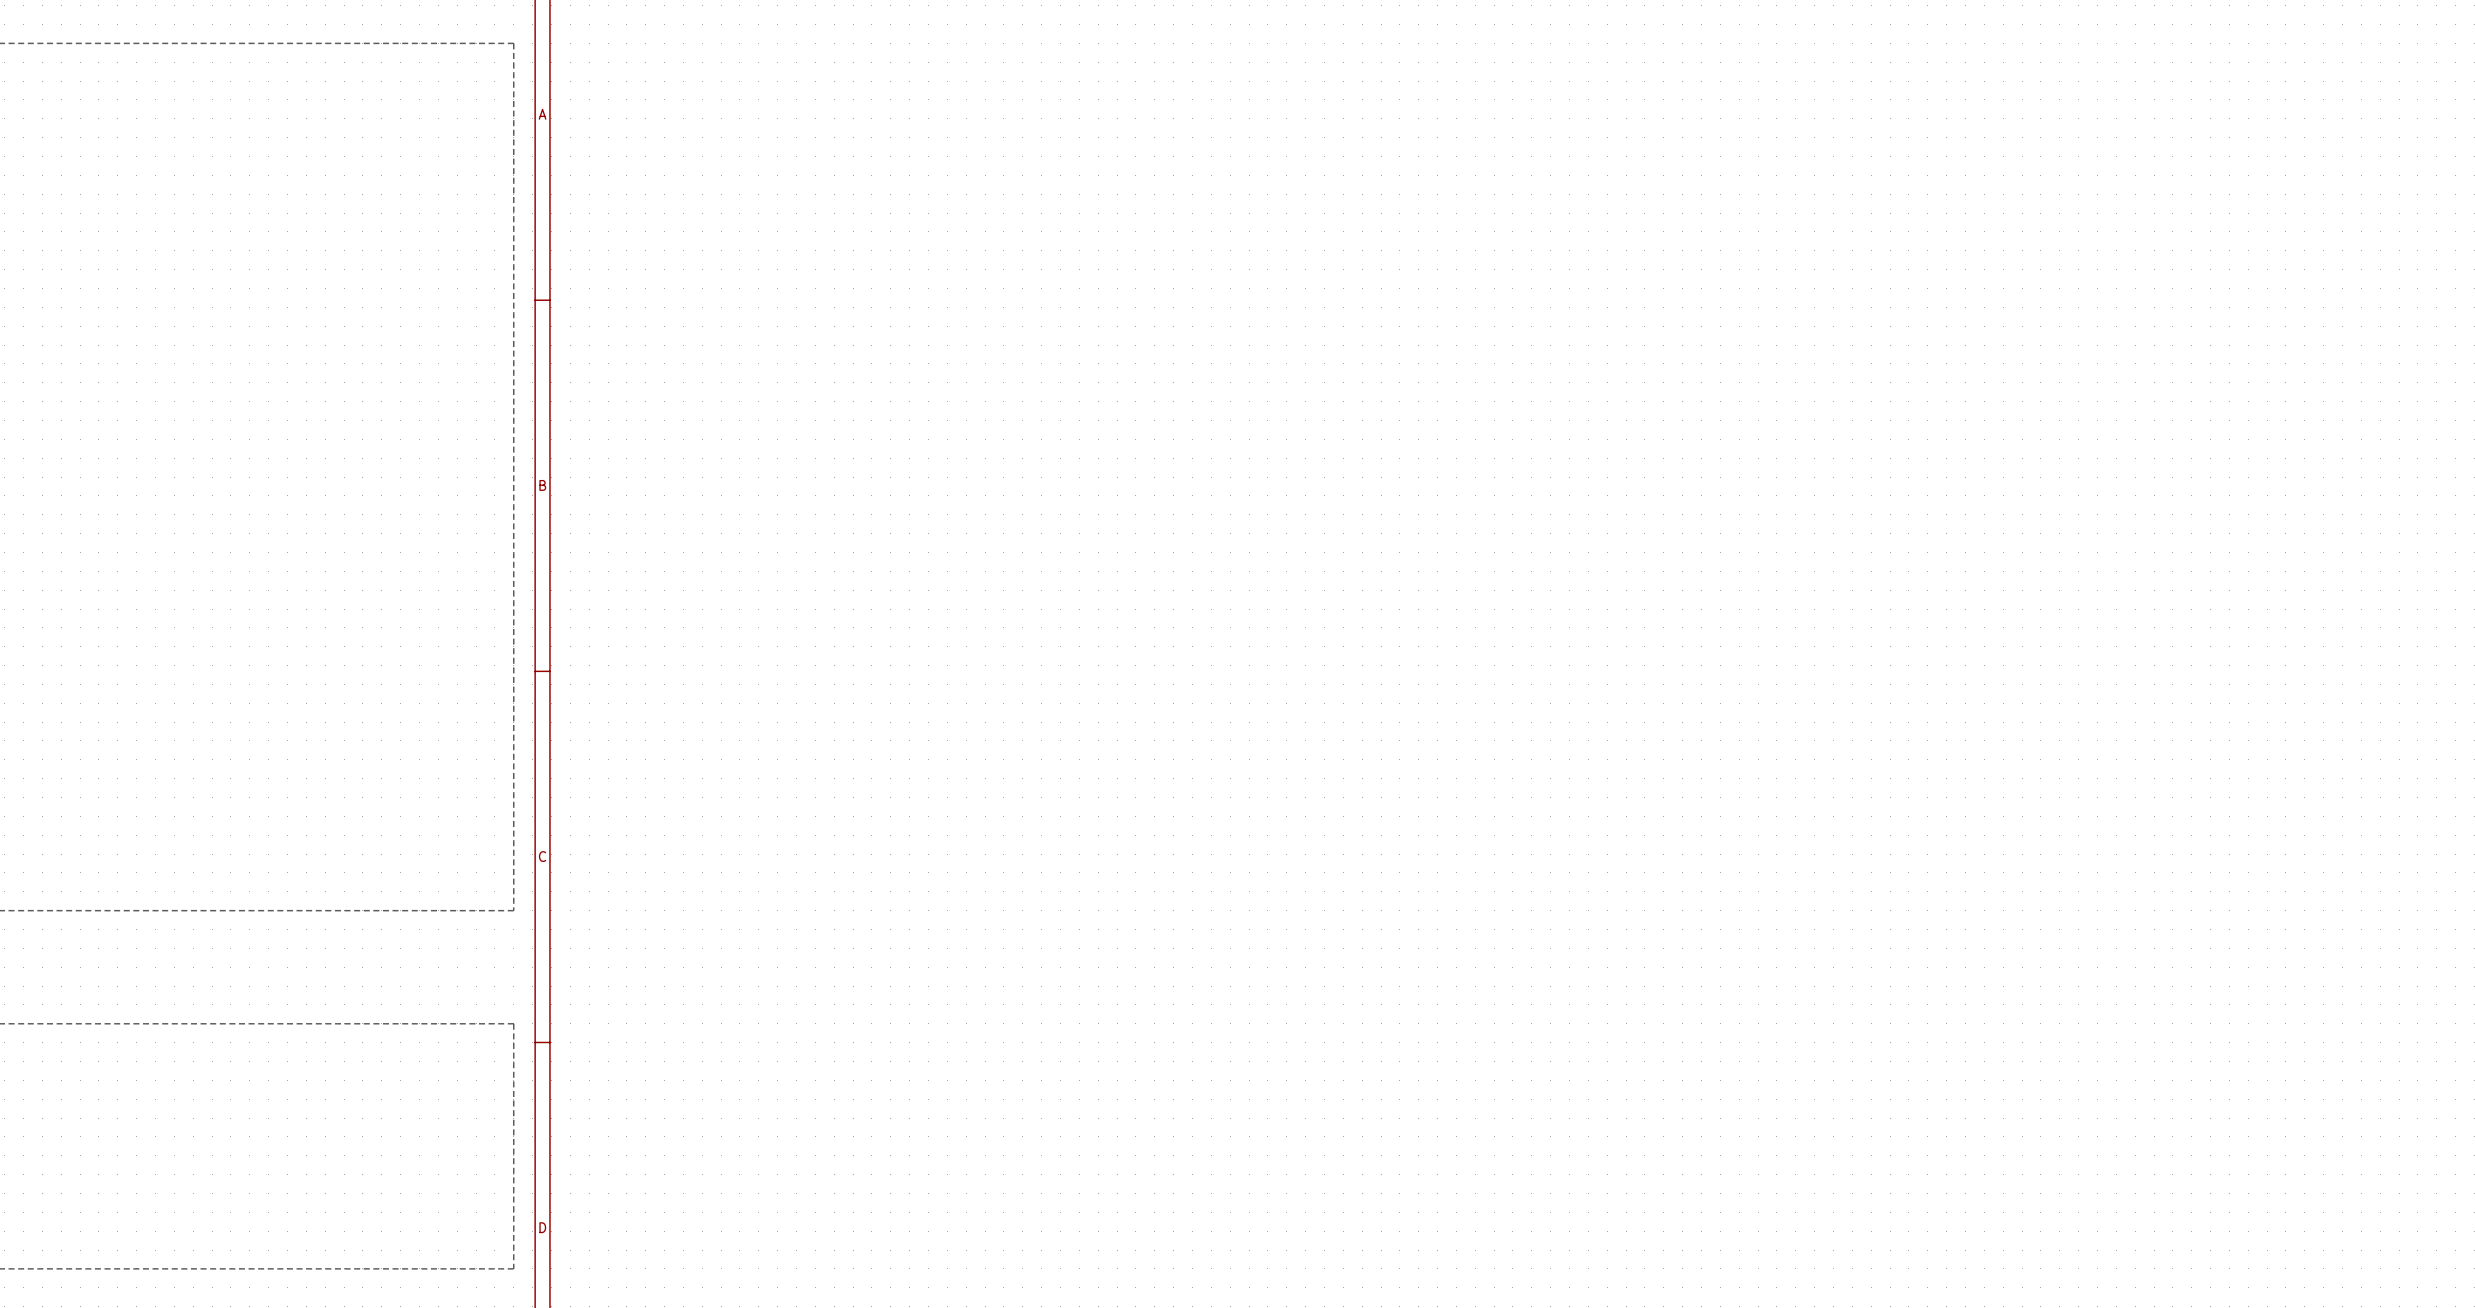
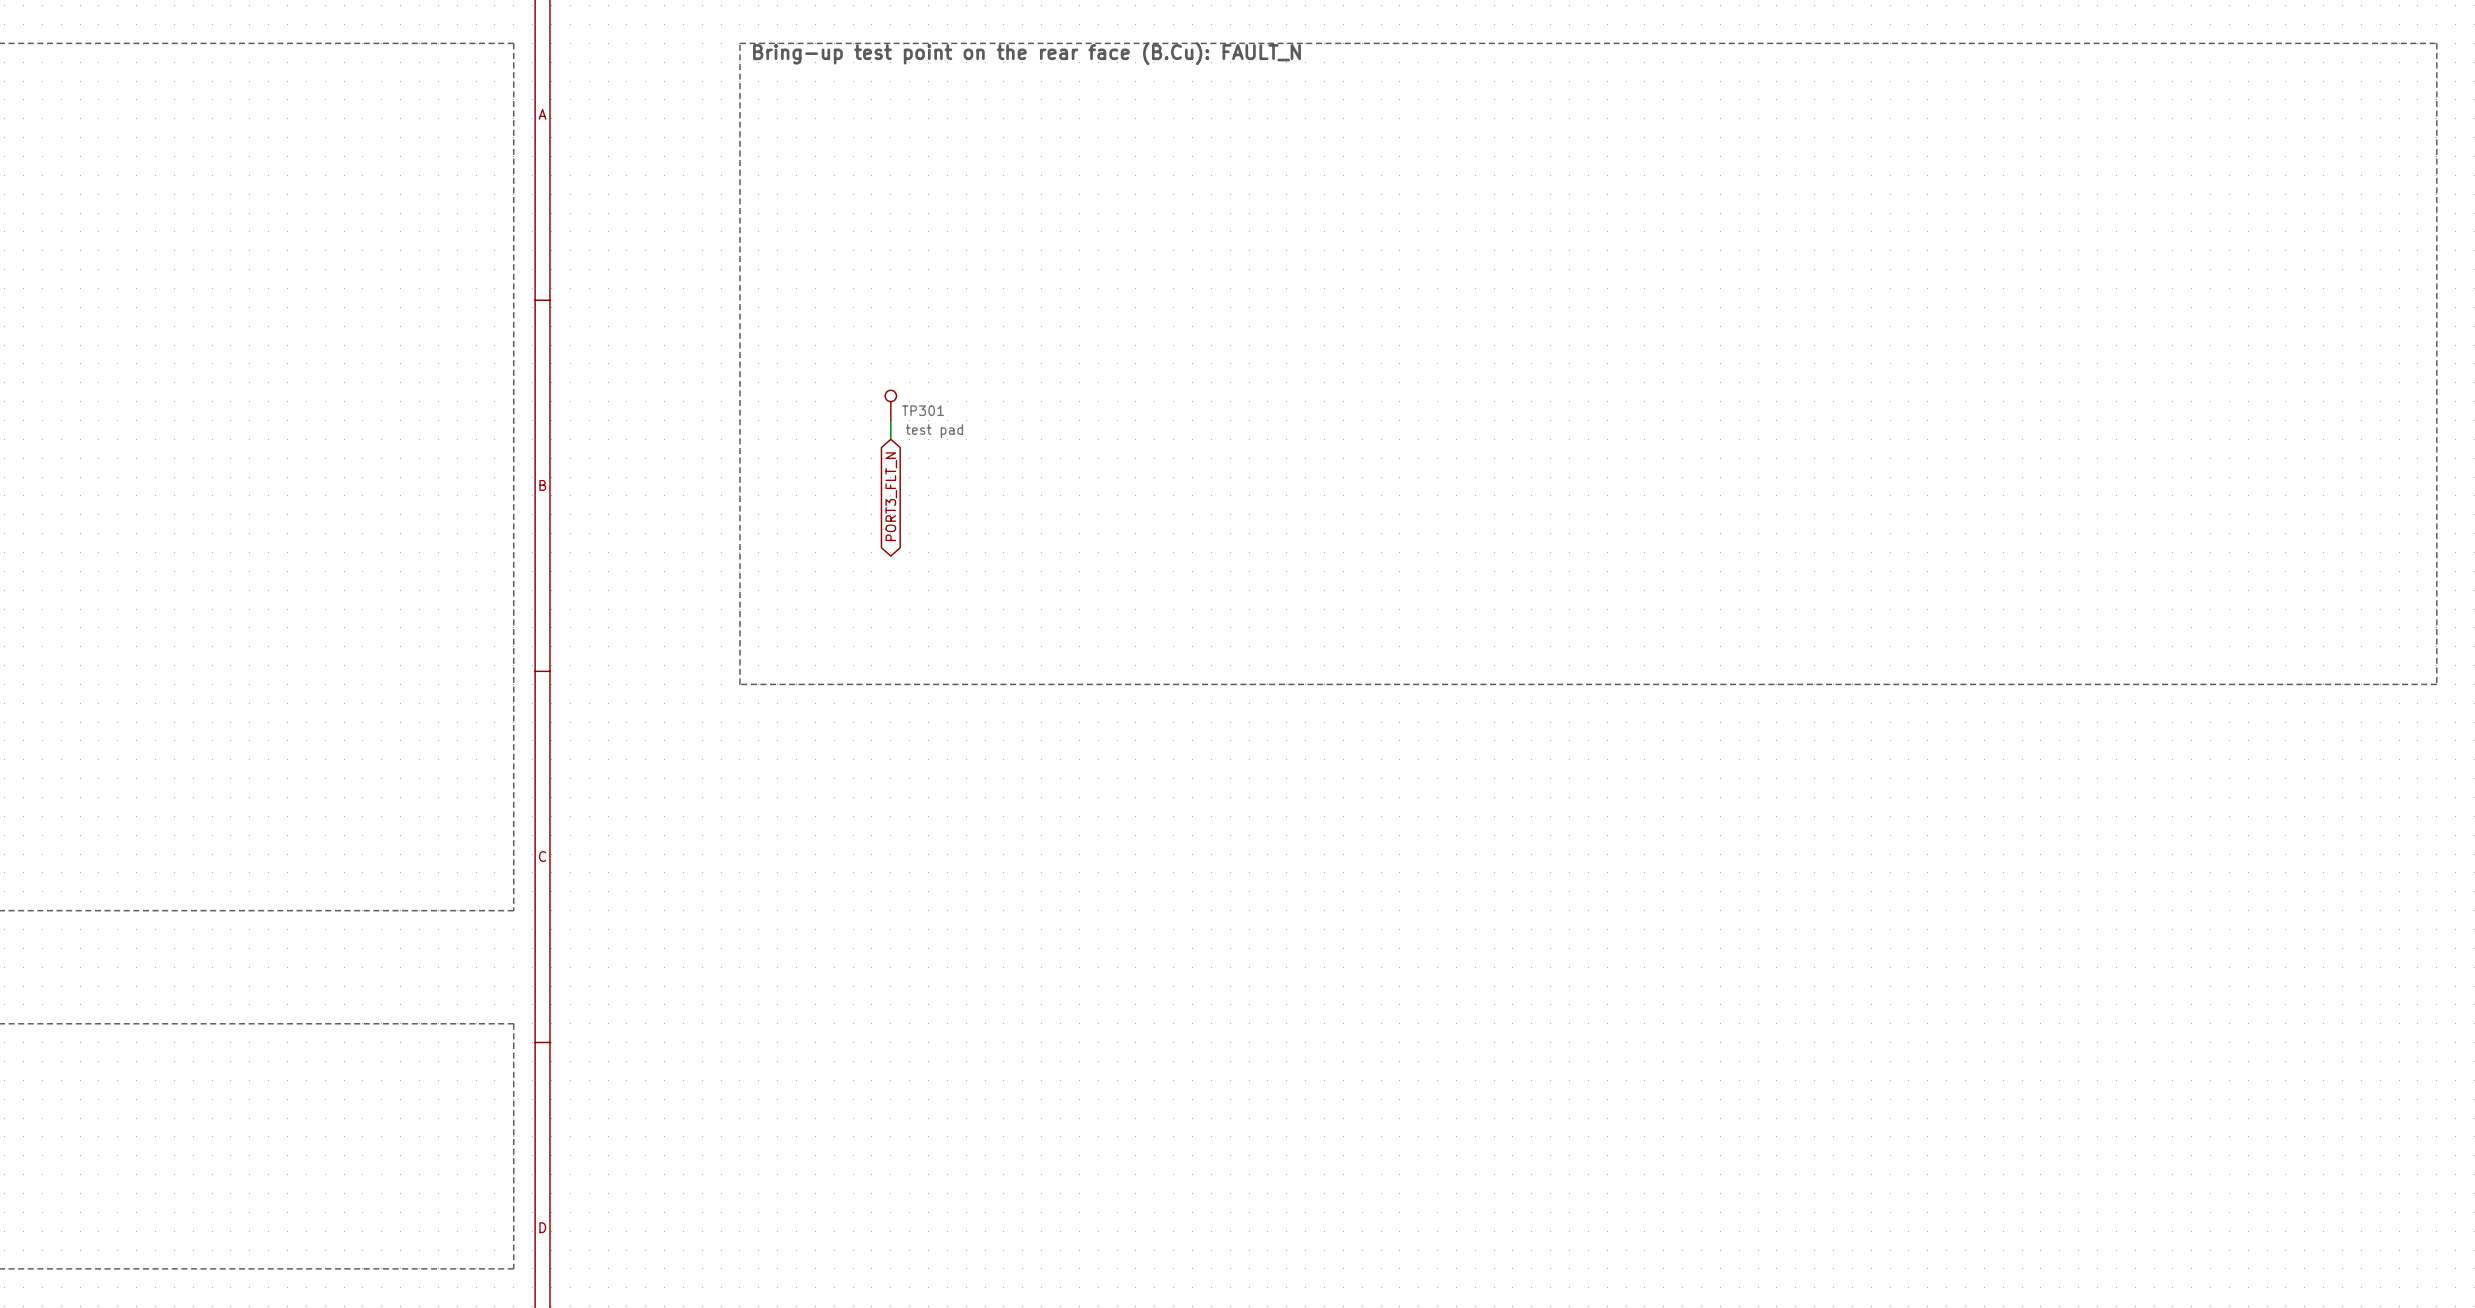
line: none -> (739, 43) (2436, 43) (2436, 684) (739, 684) (739, 43)
text: none -> Bring-up test point on the rear face (B.Cu): FAULT_N (1026, 53)
TP301: none -> test pad (890, 405)
wire: none -> (890, 420) (890, 439)
global label: none -> PORT3_FLT_N (891, 496)

